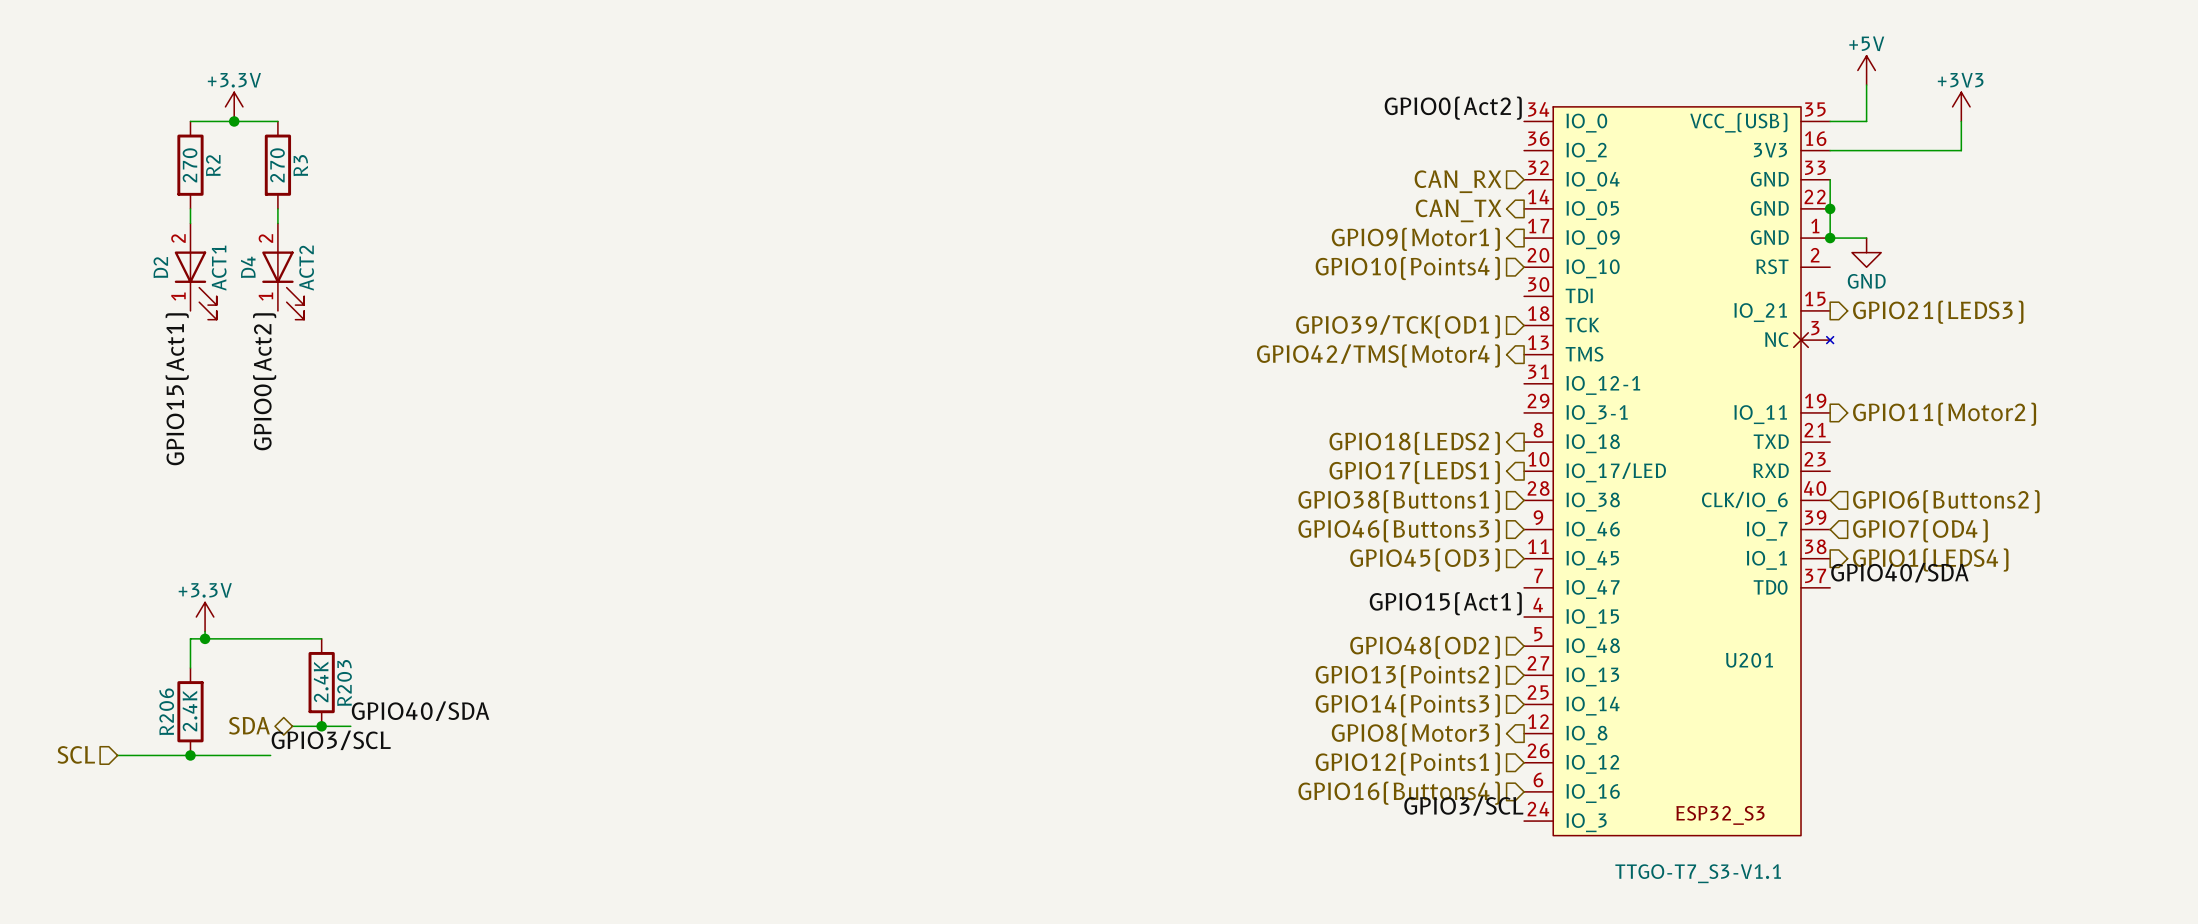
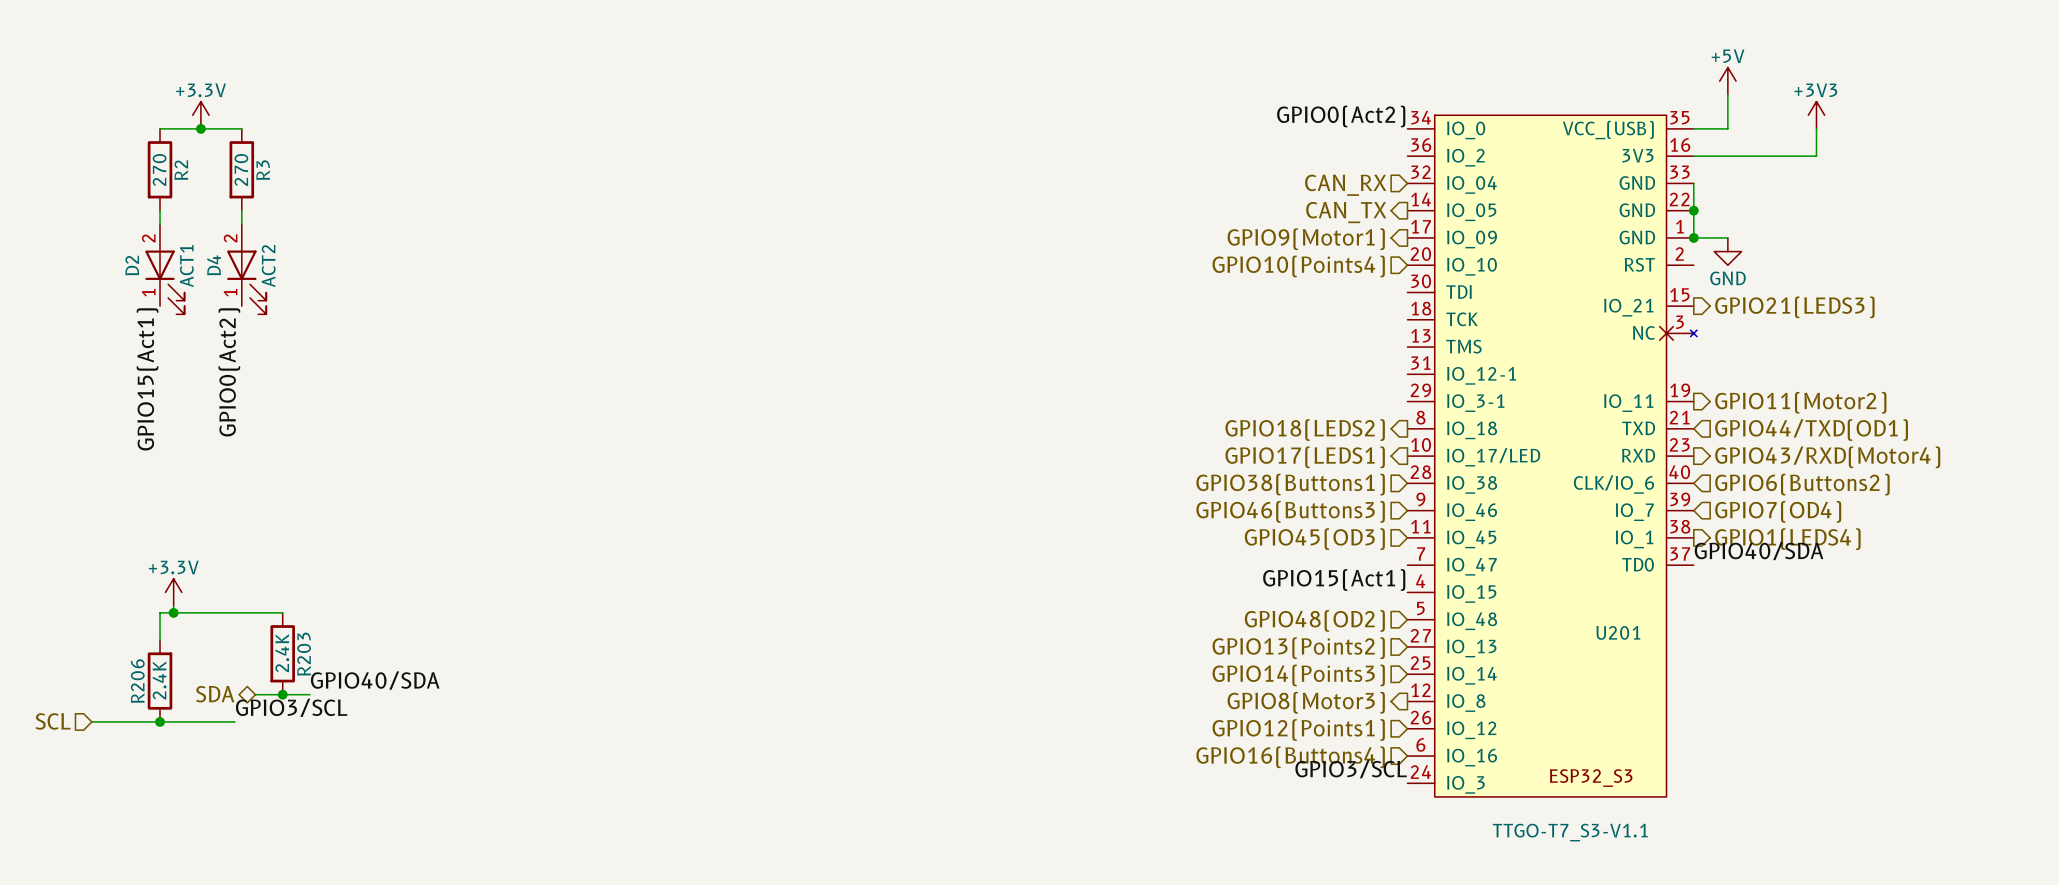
hierarchical label: GPIO39/TCK(OD1) (1398, 326) -> none
hierarchical label: GPIO42/TMS(Motor4) (1378, 355) -> none
hierarchical label: none -> GPIO44/TXD(OD1) (1811, 430)
hierarchical label: none -> GPIO43/RXD(Motor4) (1827, 457)

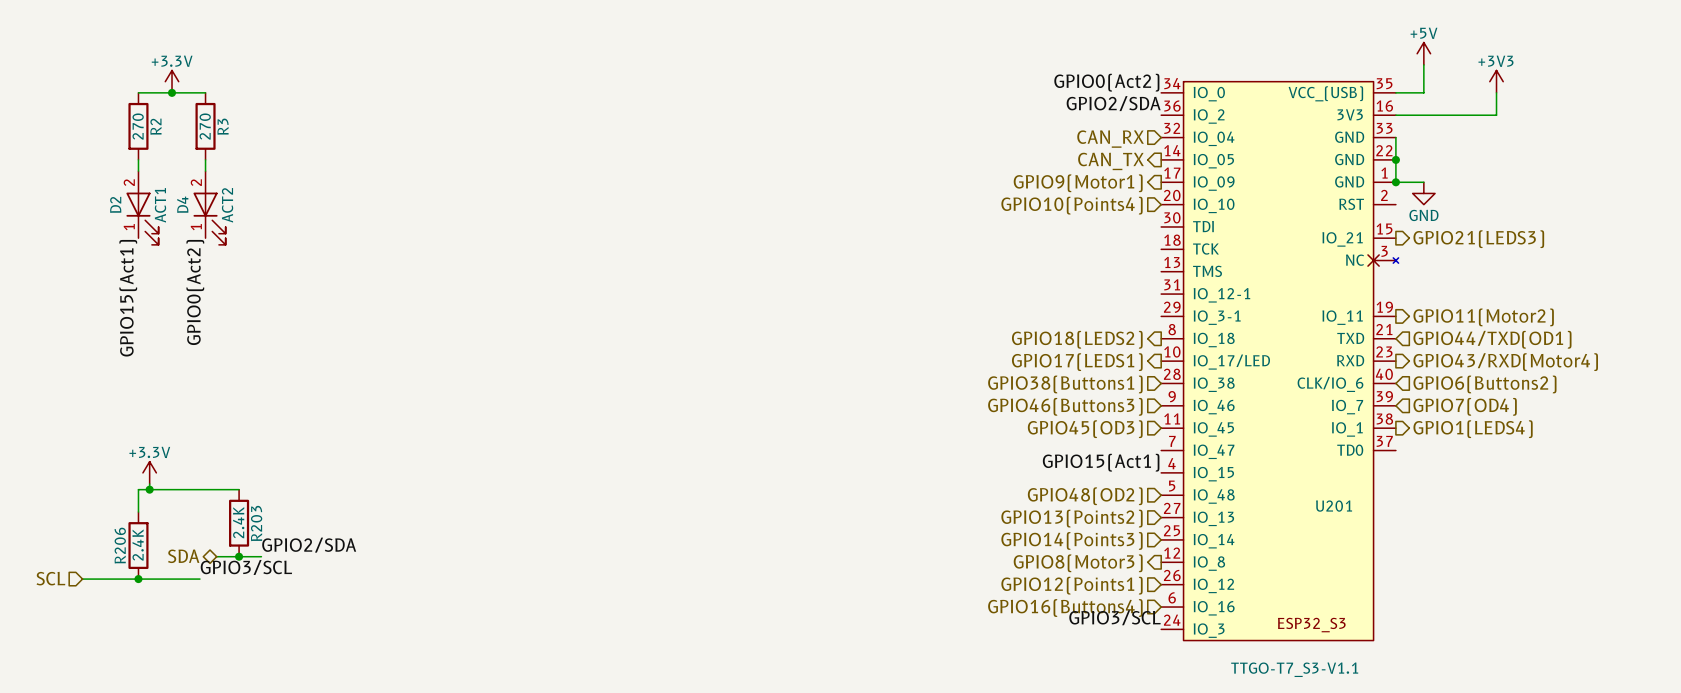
label: none -> GPIO2/SDA (1113, 103)
label: GPIO40/SDA (1759, 551) -> none
label: GPIO40/SDA (375, 680) -> GPIO2/SDA (309, 545)

